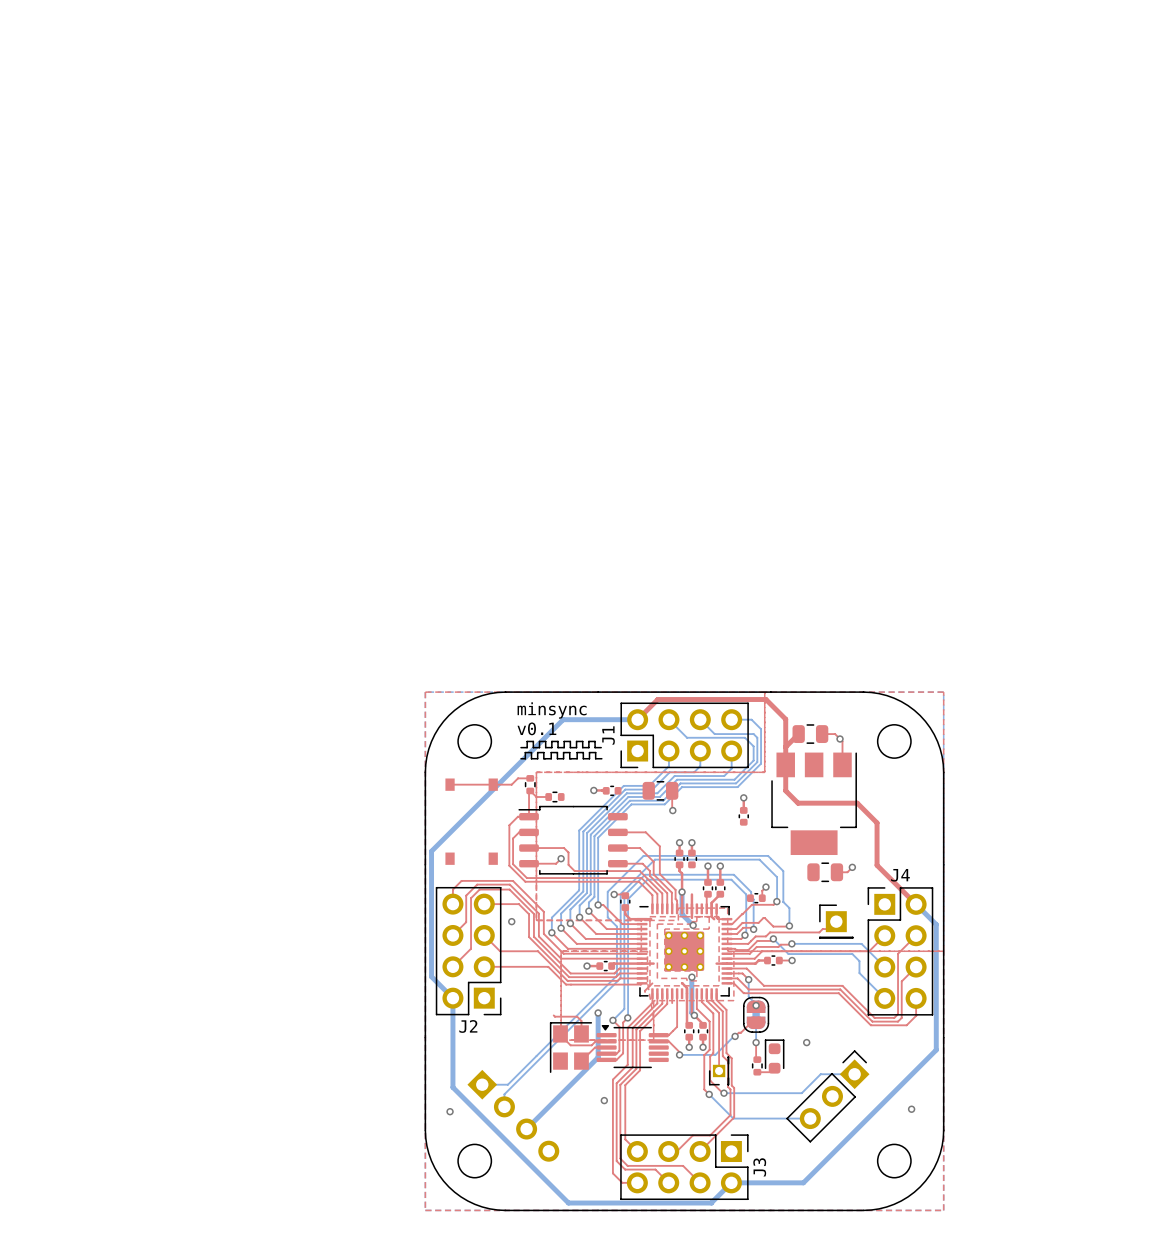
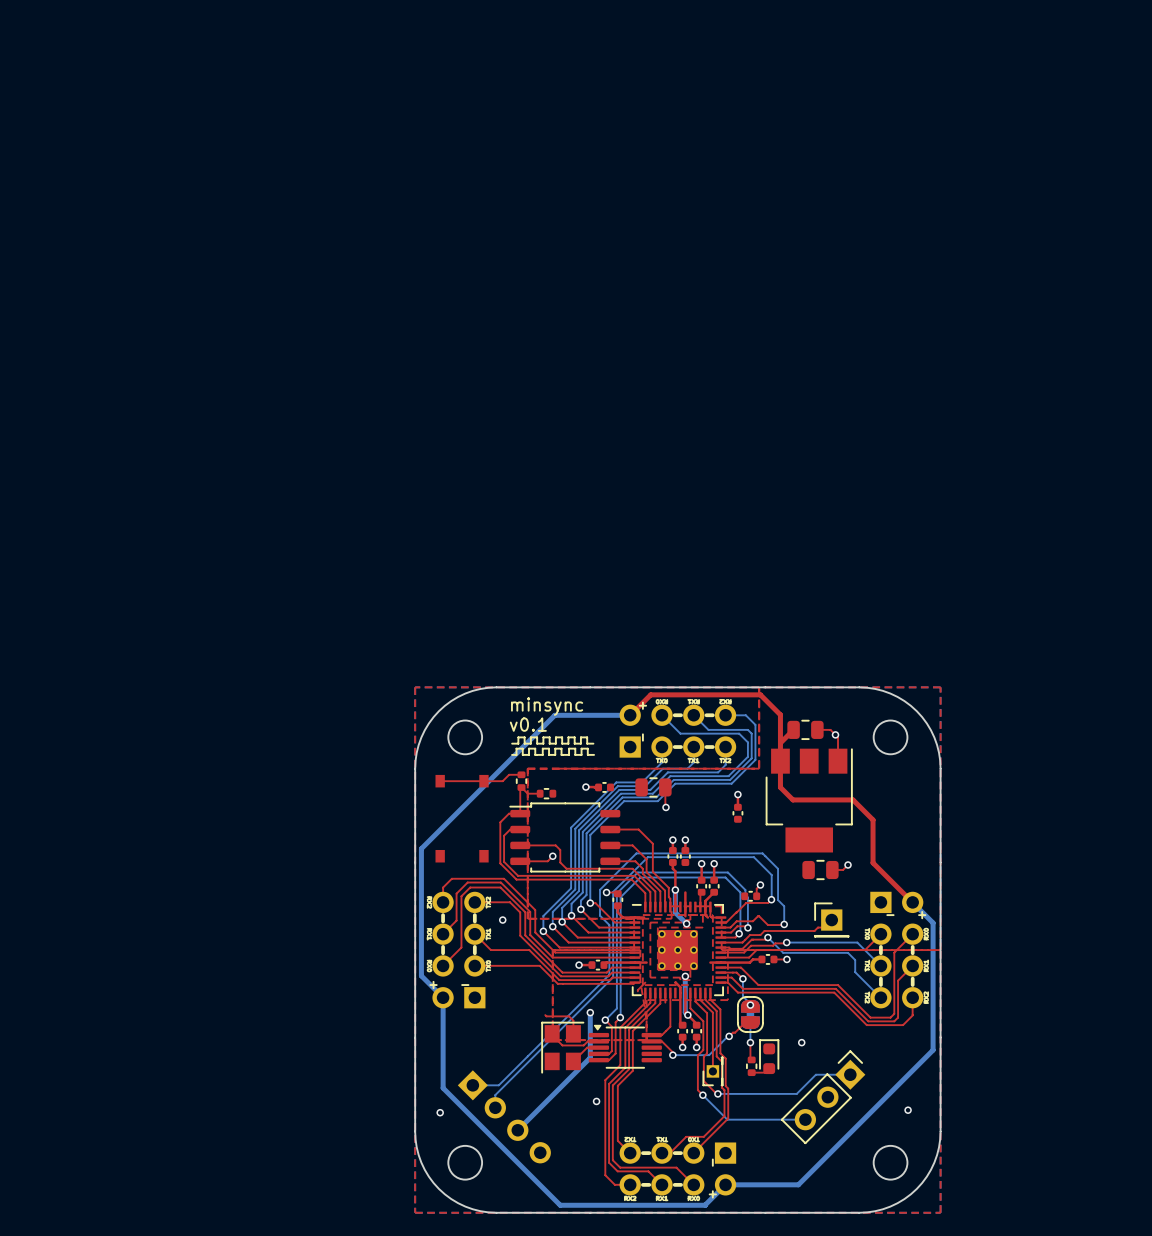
part: none -> (677, 729)
J1: (684, 735) -> none
part: none -> (457, 950)
J2: (468, 951) -> none
J4: (900, 951) -> none
part: none -> (898, 950)
J3: (684, 1167) -> none
part: none -> (677, 1170)

